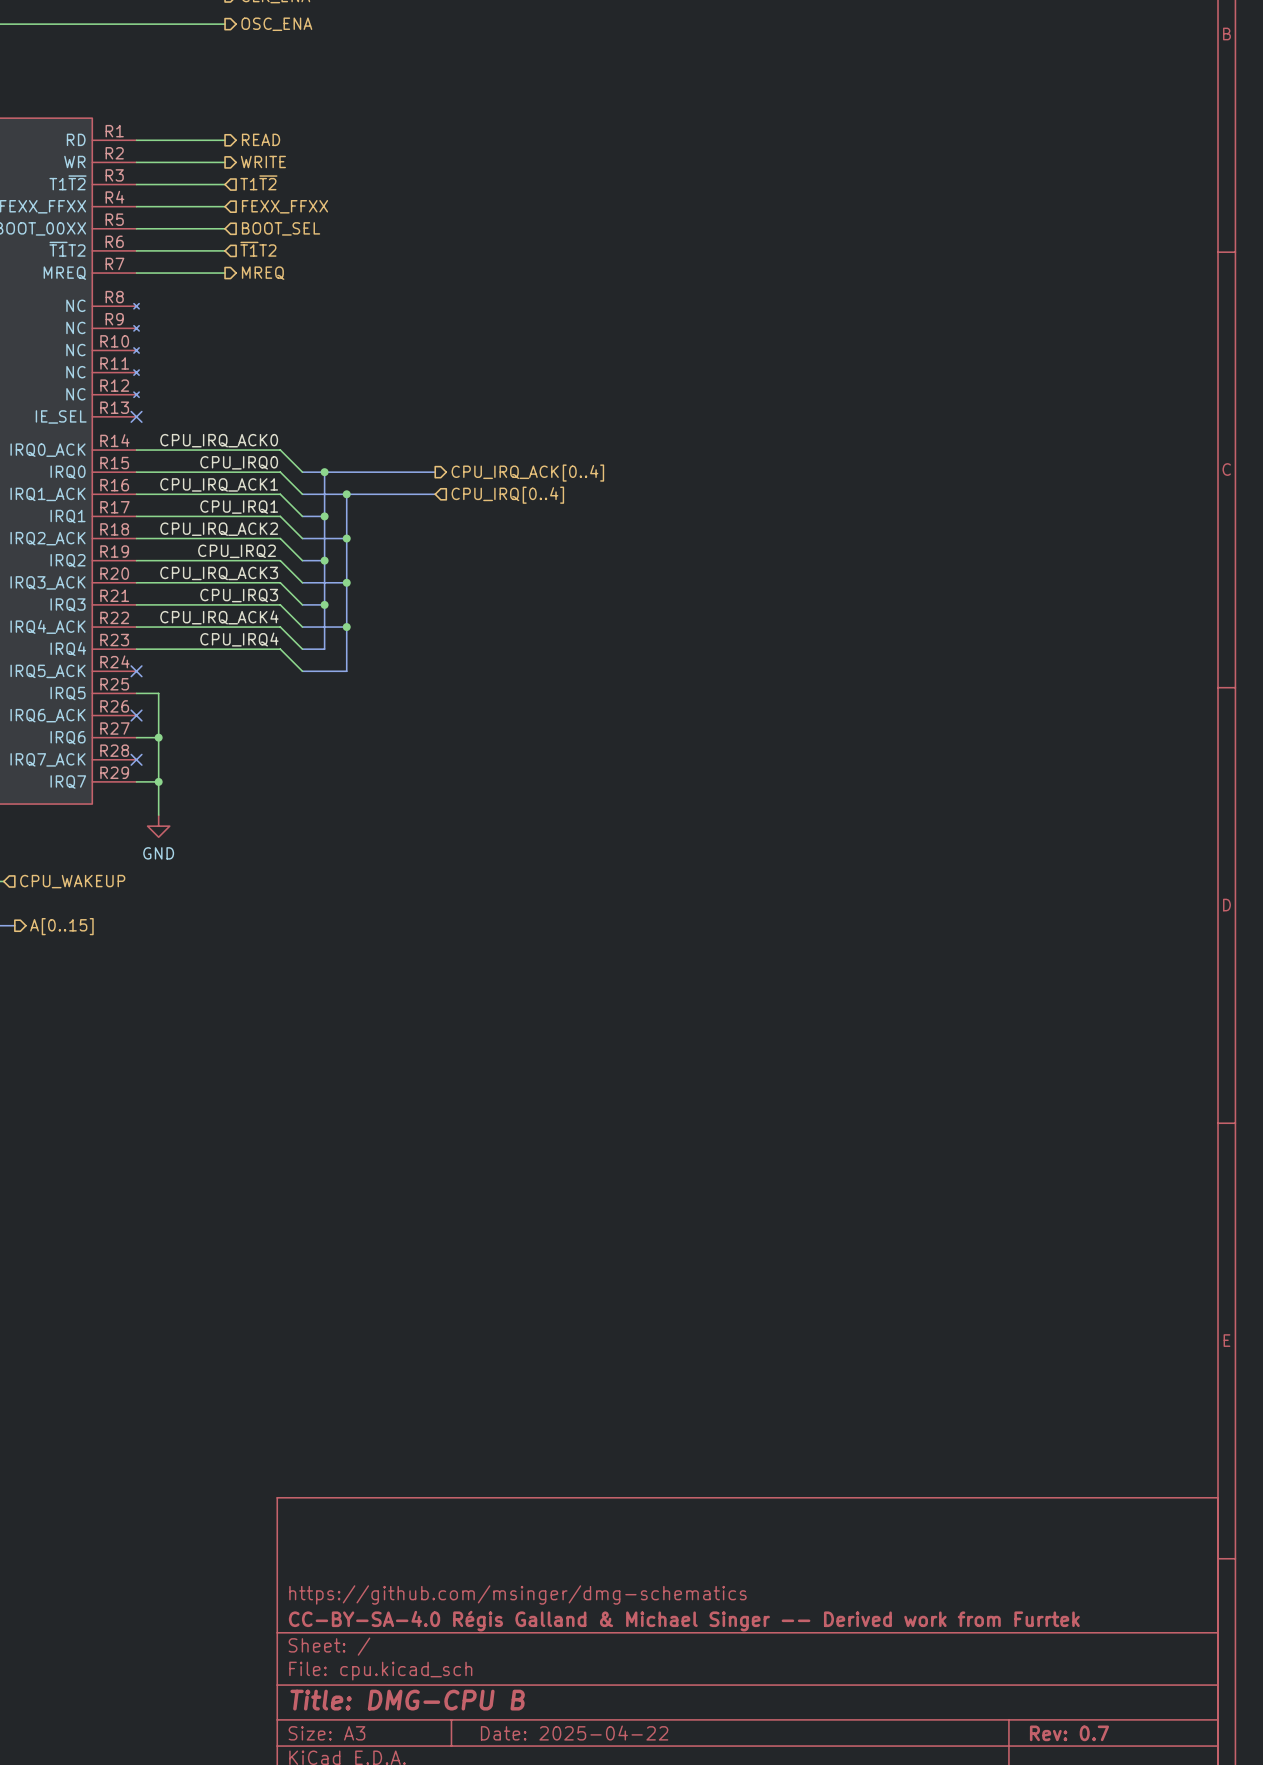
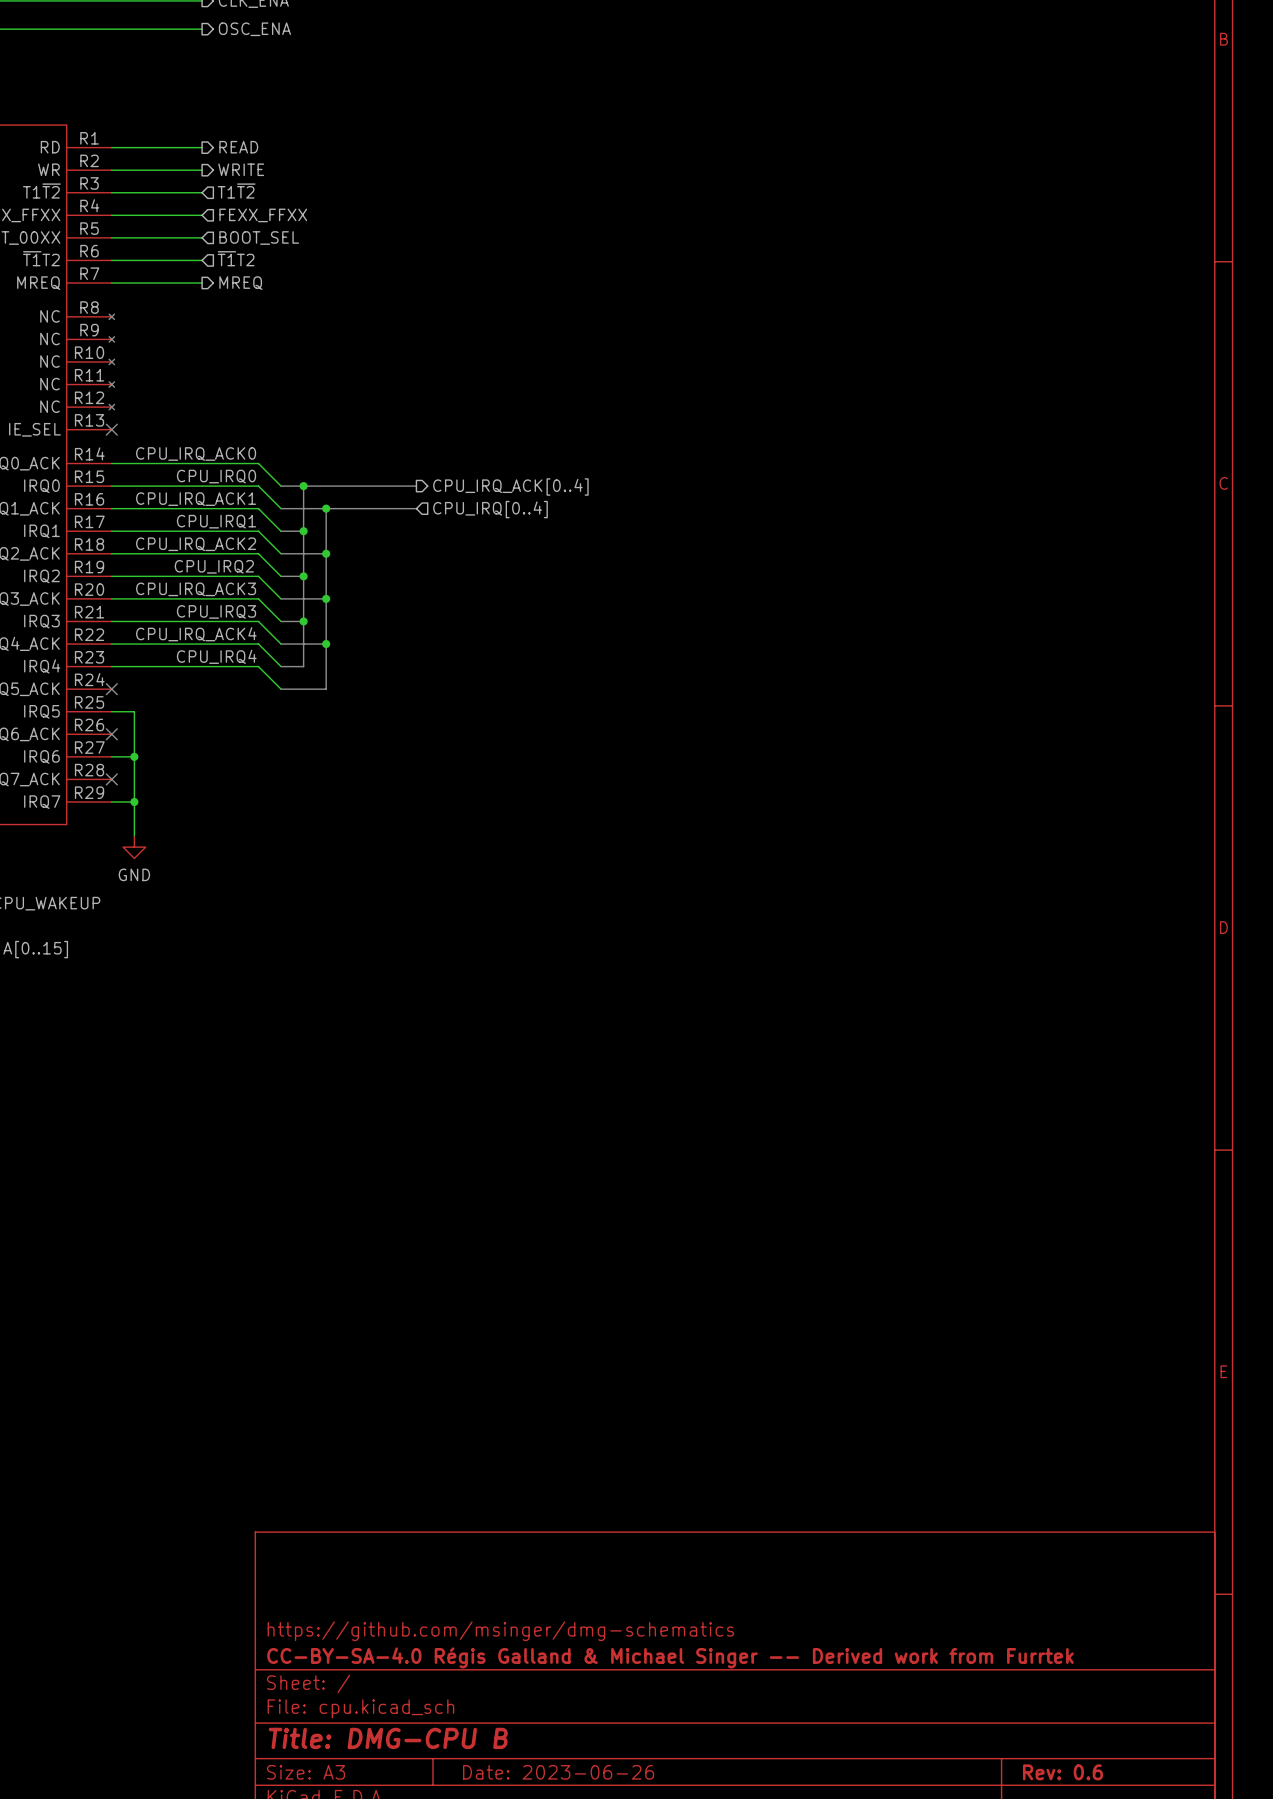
title block: Date: 2025-04-22 (574, 1733) -> Date: 2023-06-26 (558, 1772)
title block: Rev: 0.7 (1069, 1733) -> Rev: 0.6 (1062, 1772)

